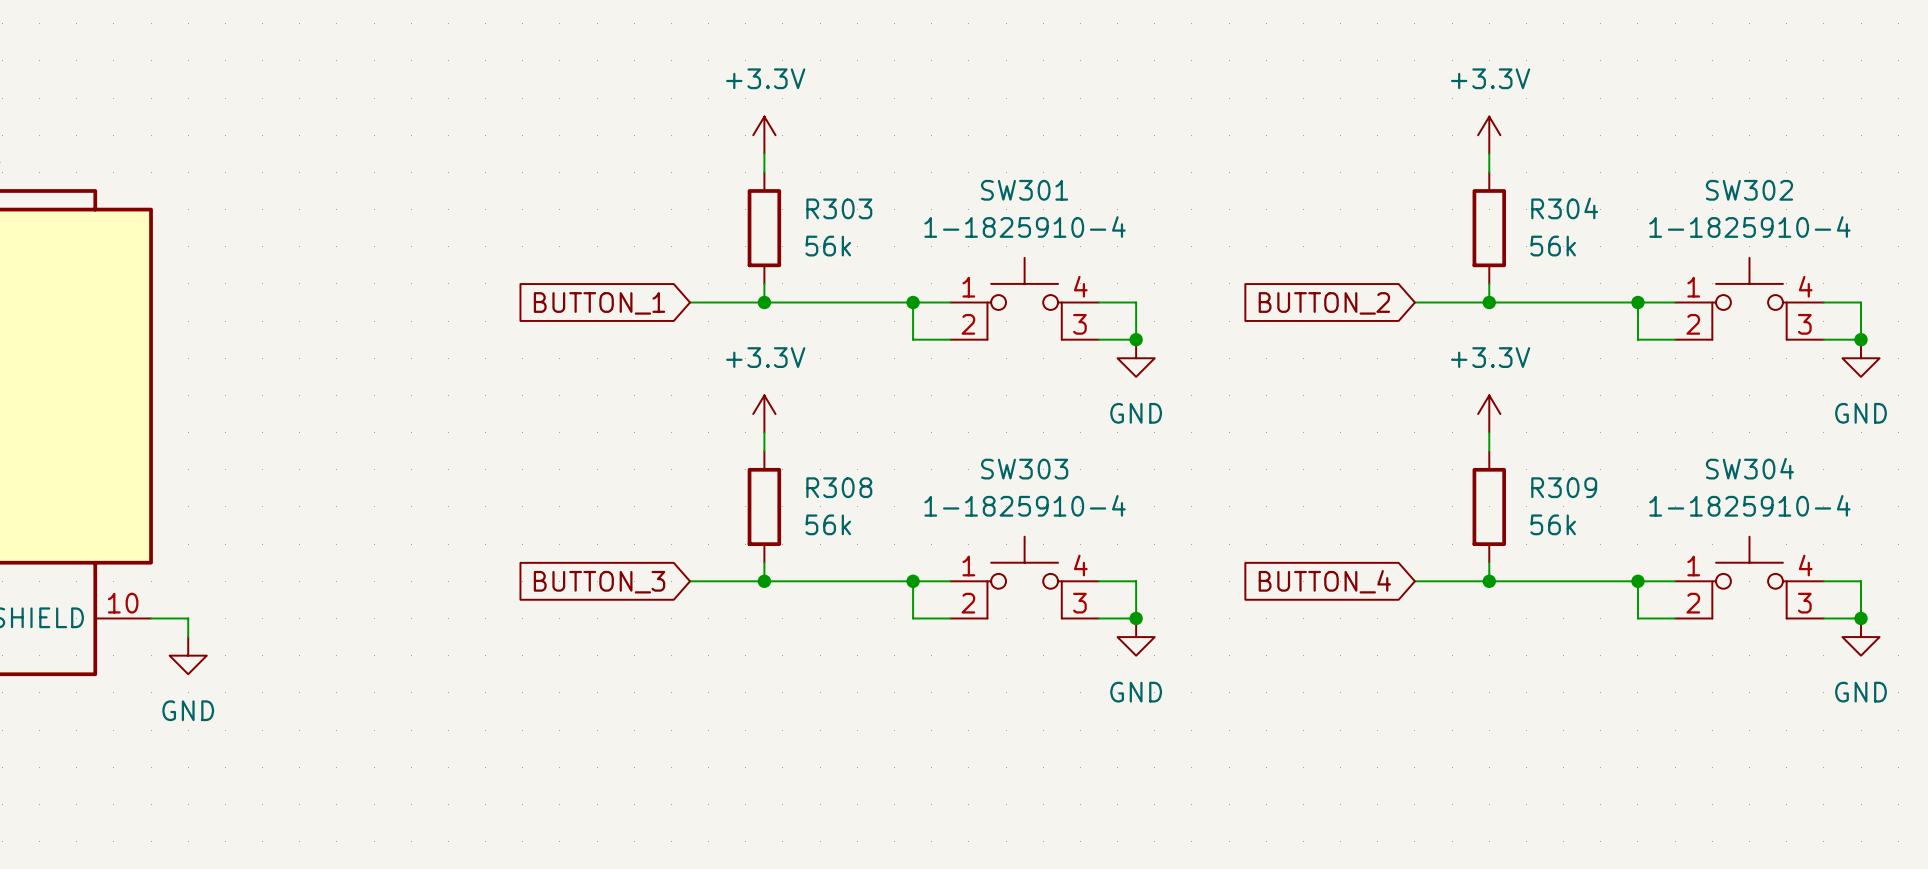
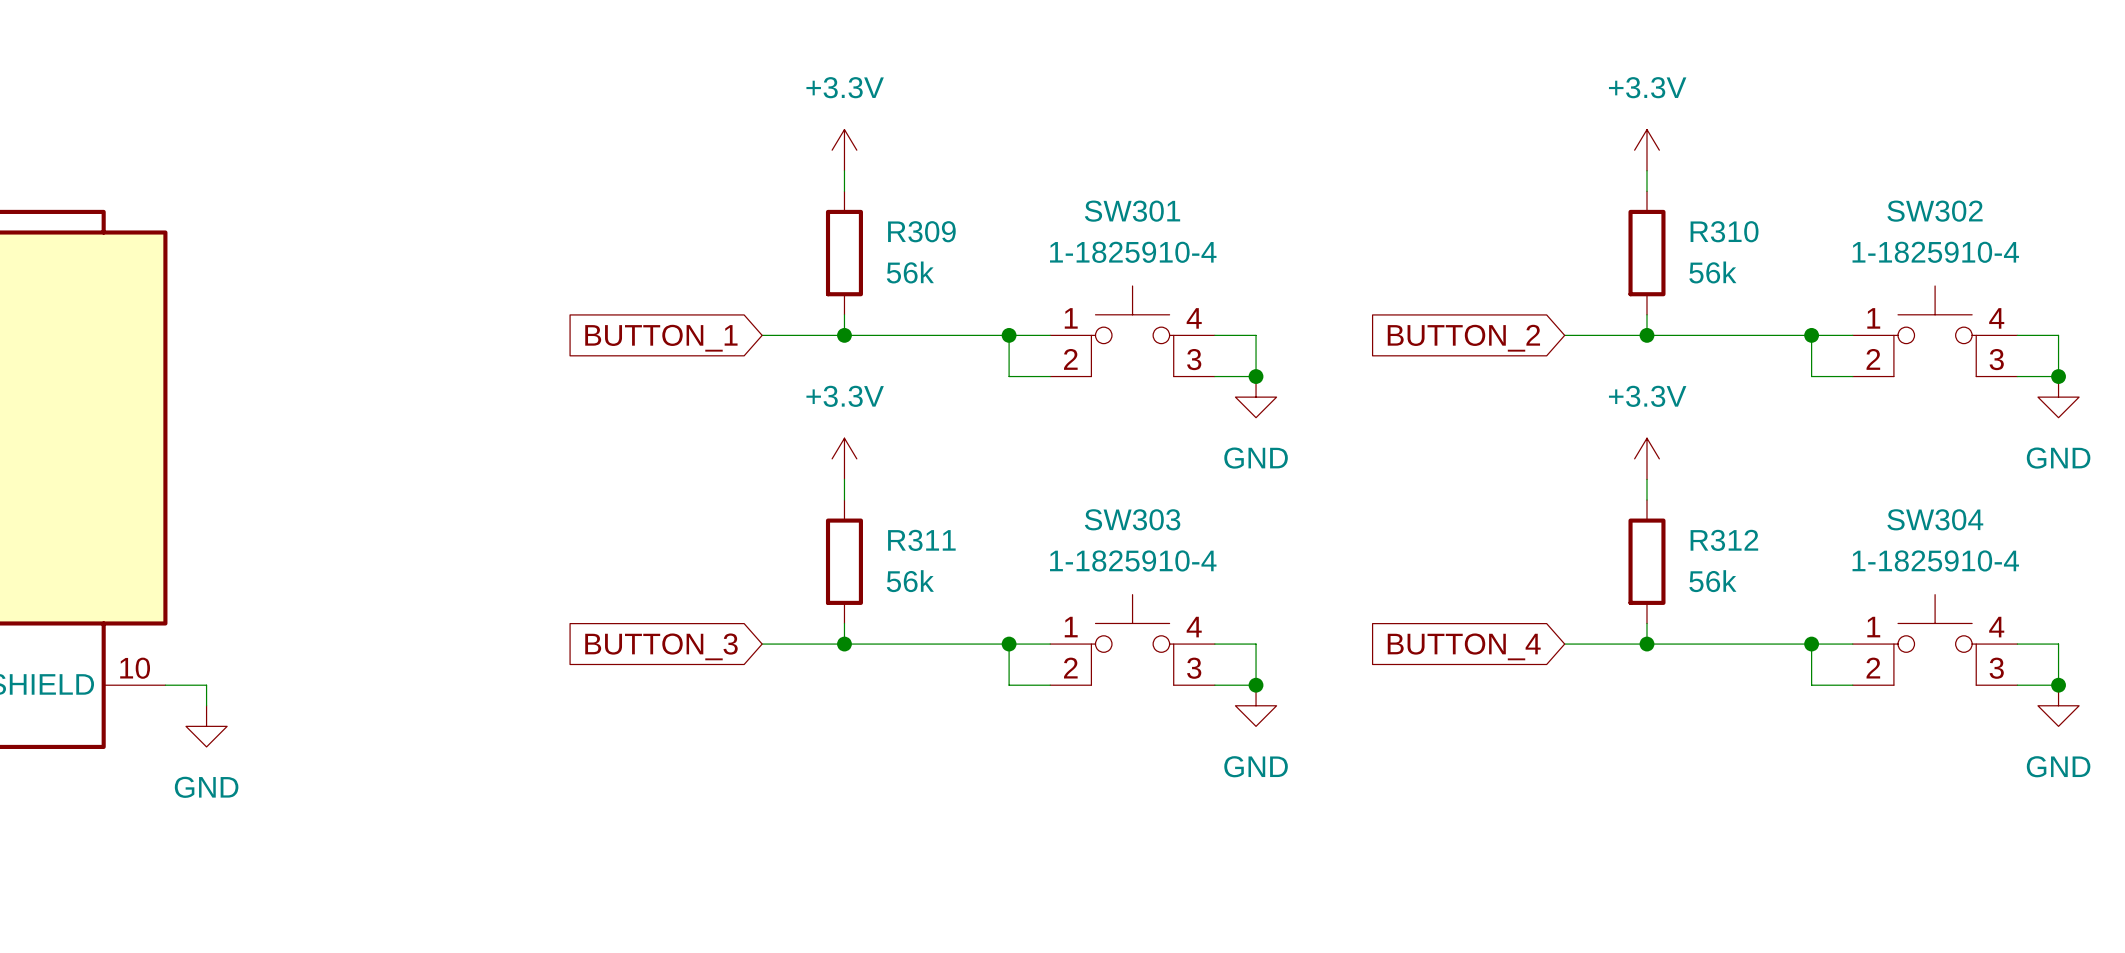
R303 name: R303 (839, 208) -> R309 (921, 231)
R304 name: R304 (1564, 208) -> R310 (1724, 231)
R308 name: R308 (839, 487) -> R311 (921, 540)
R309 name: R309 (1564, 487) -> R312 (1724, 540)

